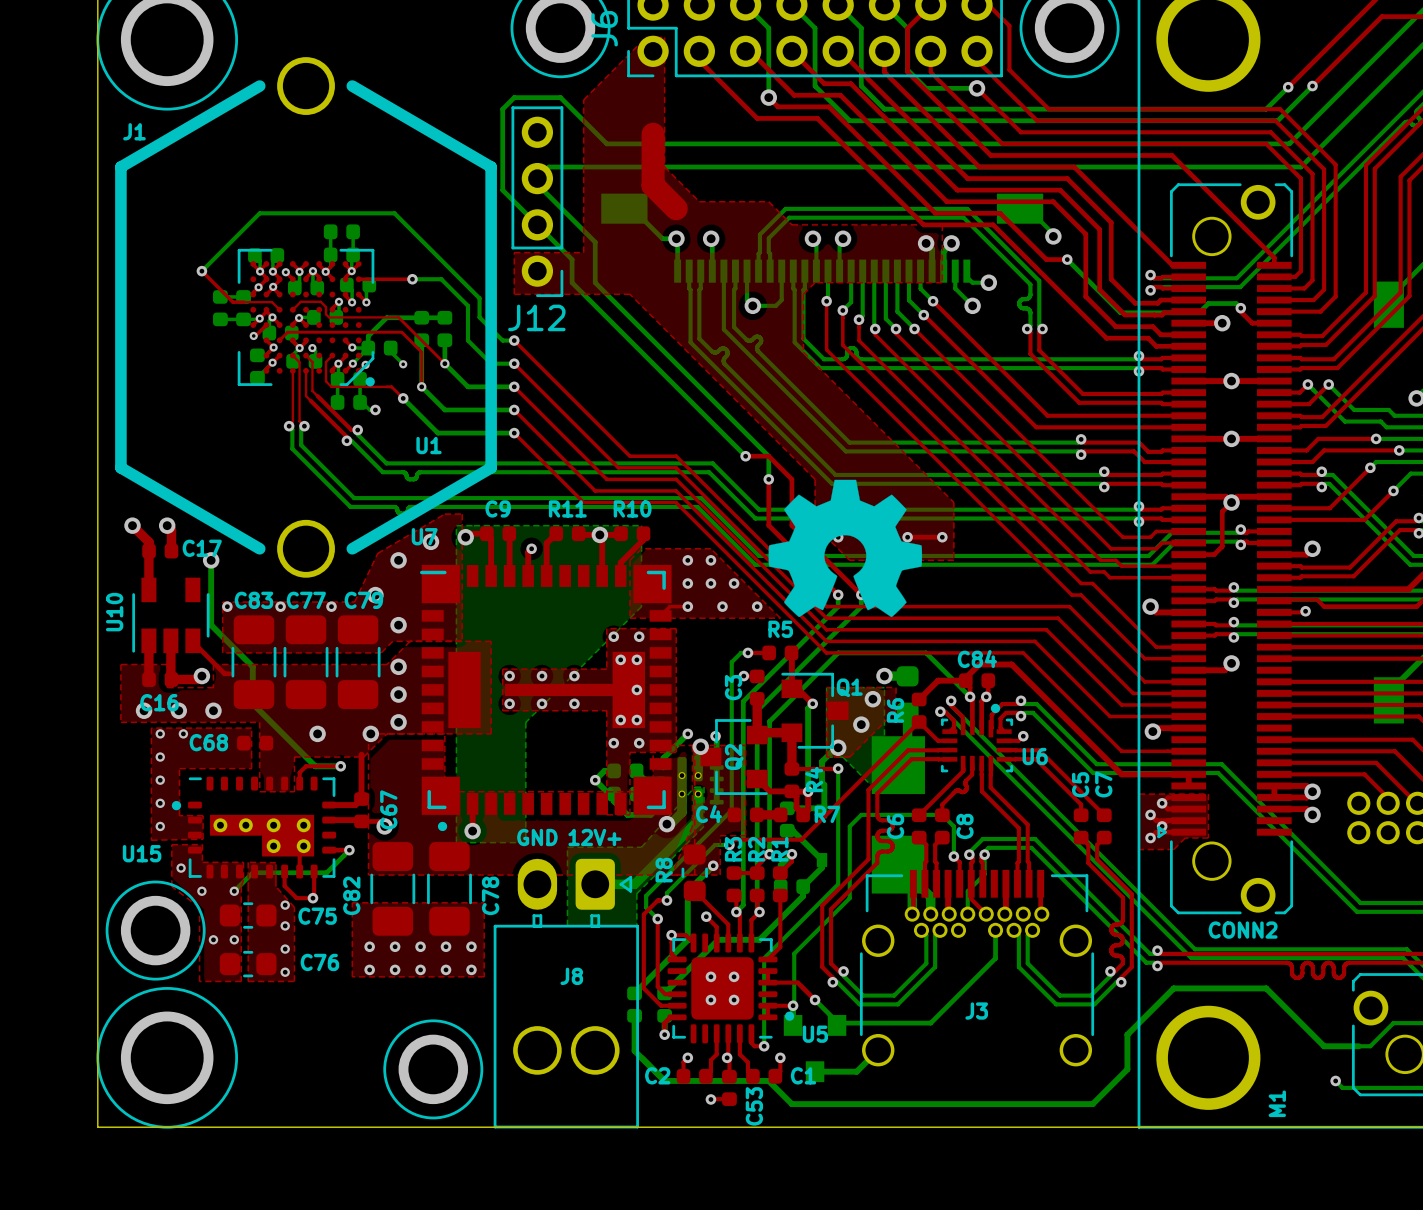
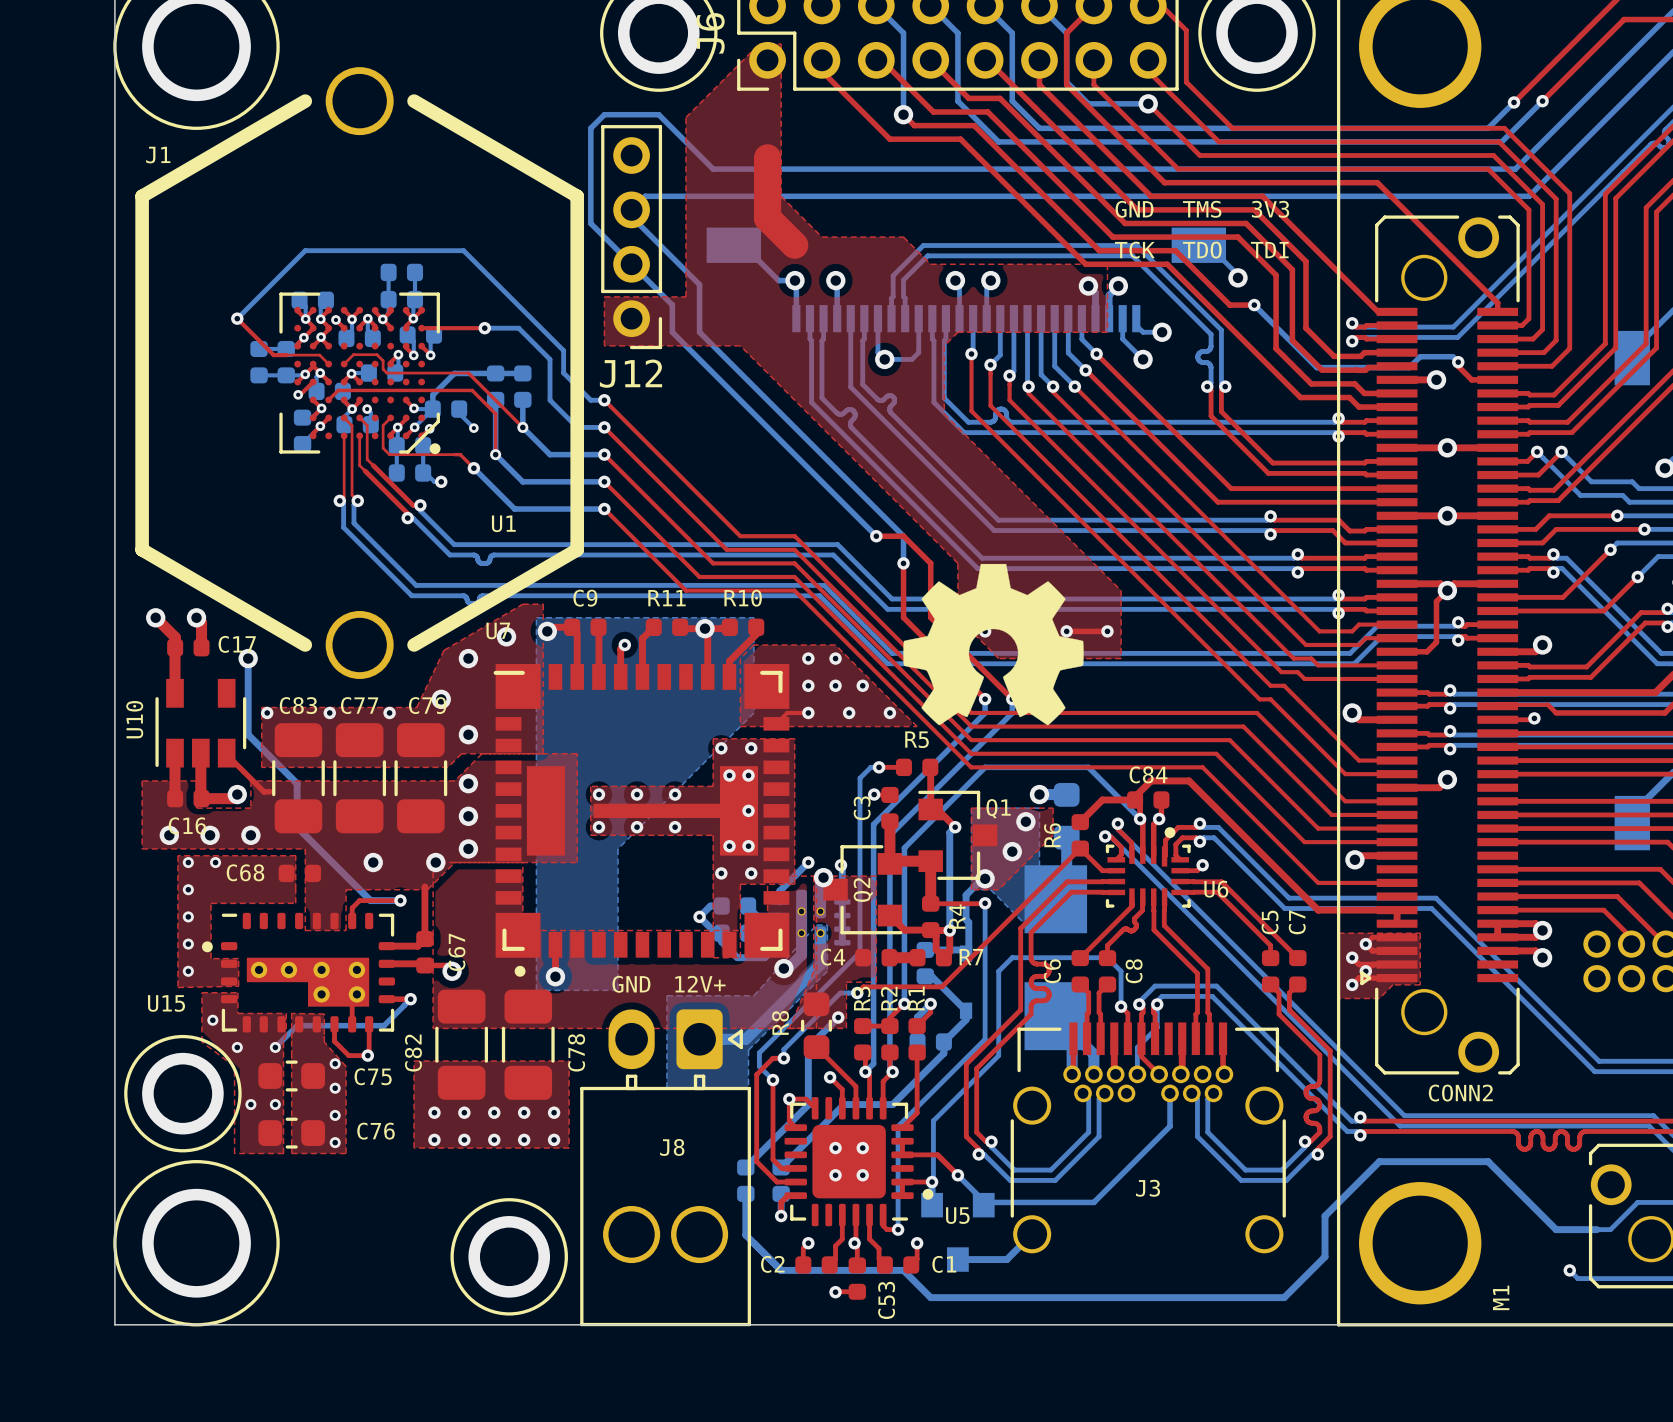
text: none -> GND (1134, 209)
text: none -> TMS (1202, 209)
text: none -> 3V3 (1270, 209)
text: none -> TCK (1134, 250)
text: none -> TDO (1202, 250)
text: none -> TDI (1269, 250)

